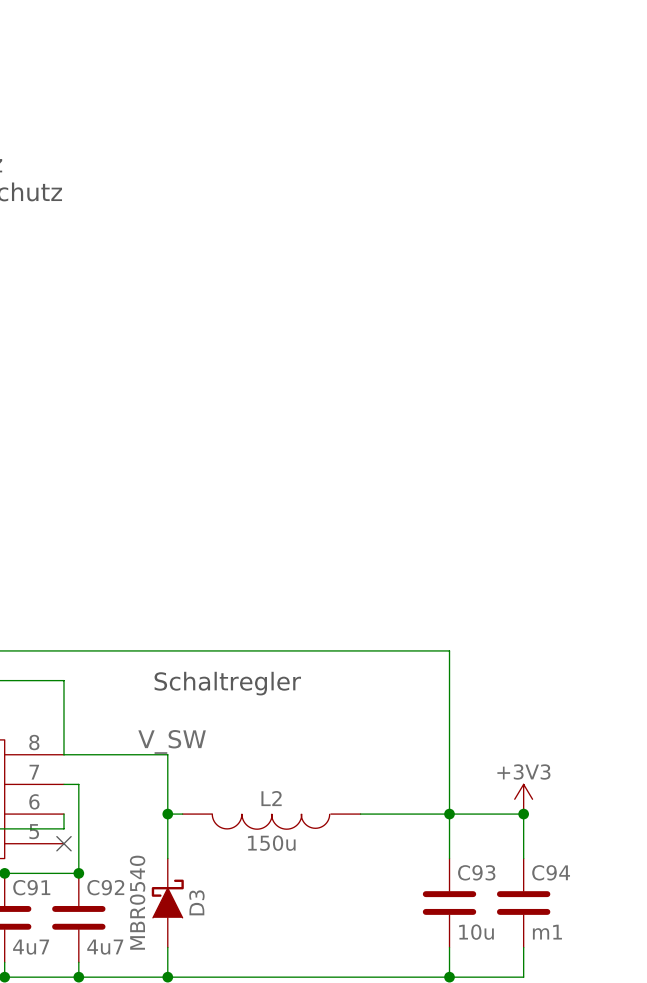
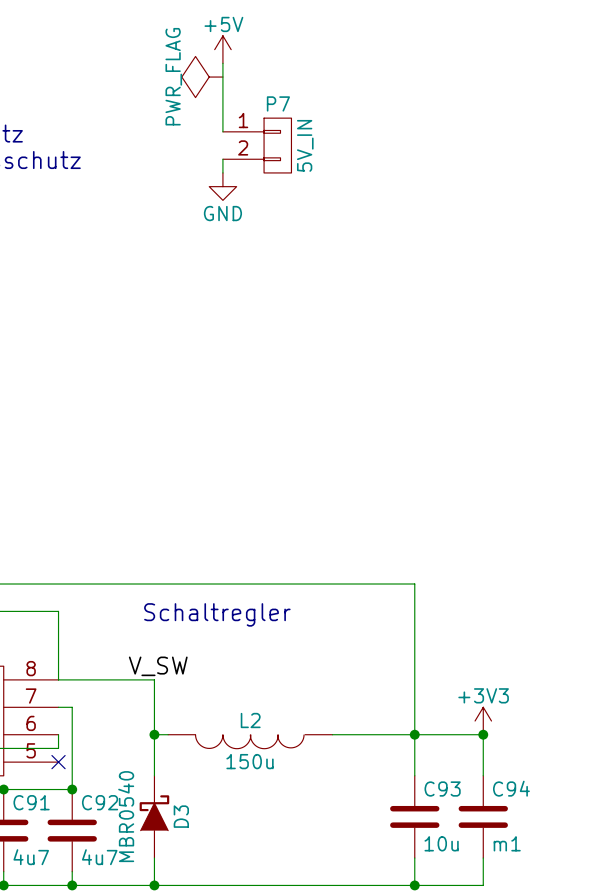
power symbol: none -> +5V (222, 49)
wire: none -> (222, 63) (222, 131)
power symbol: none -> PWR_FLAG (202, 77)
P7: none -> 5V_IN (257, 145)
wire: none -> (222, 159) (222, 172)
power symbol: none -> GND (222, 186)

